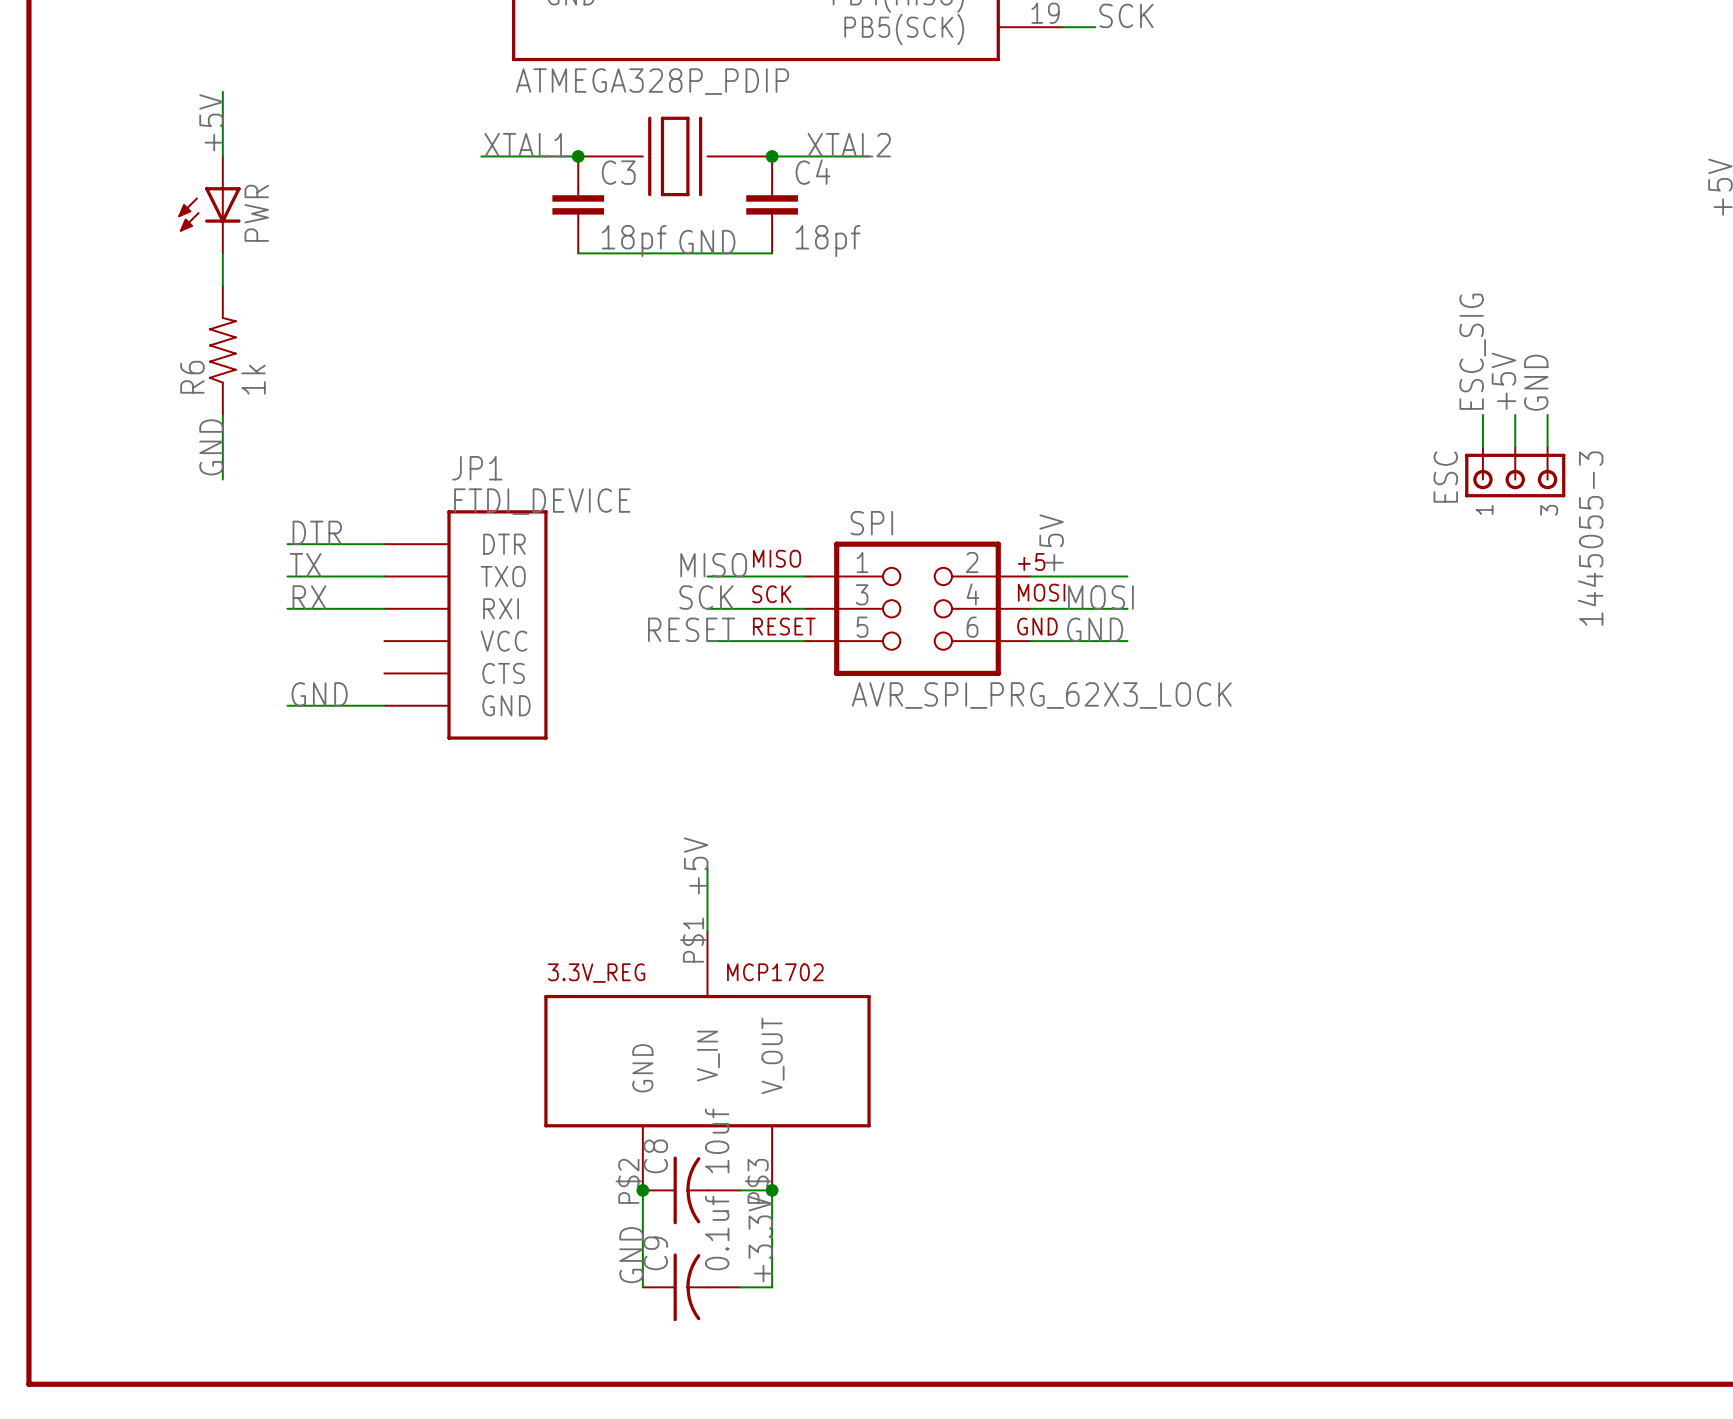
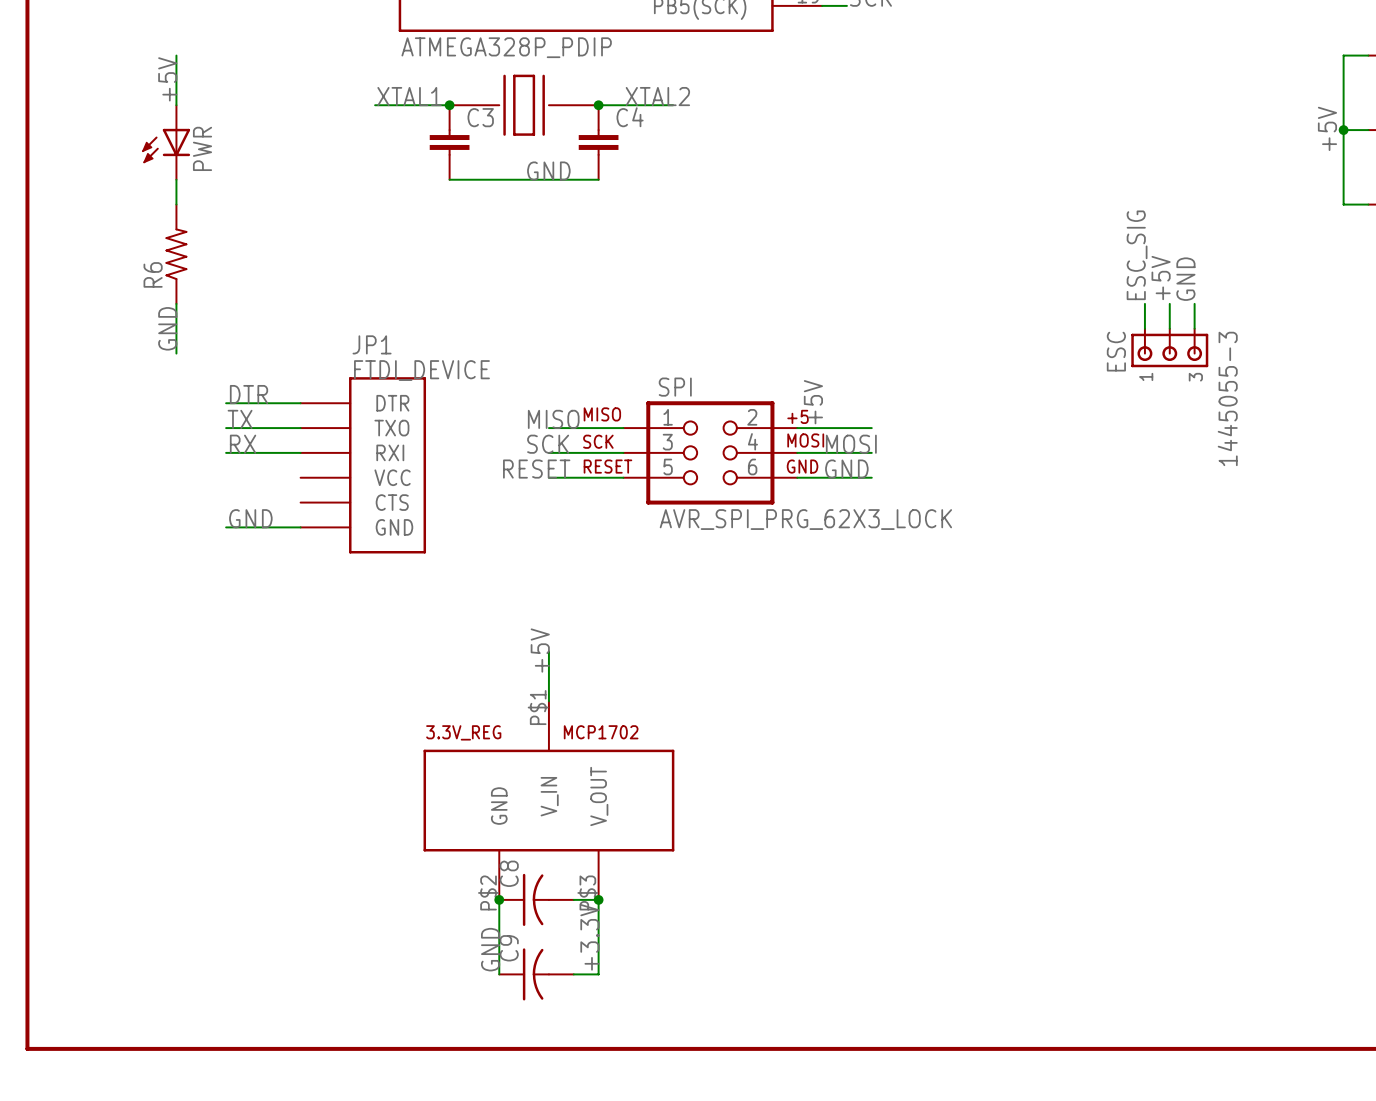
C3 value: 18pf (634, 241) -> none
C4 value: 18pf (828, 241) -> none
R6 value: 1k (253, 379) -> none
C8 value: 10uf (717, 1140) -> none
C9 value: 0.1uf (717, 1232) -> none

